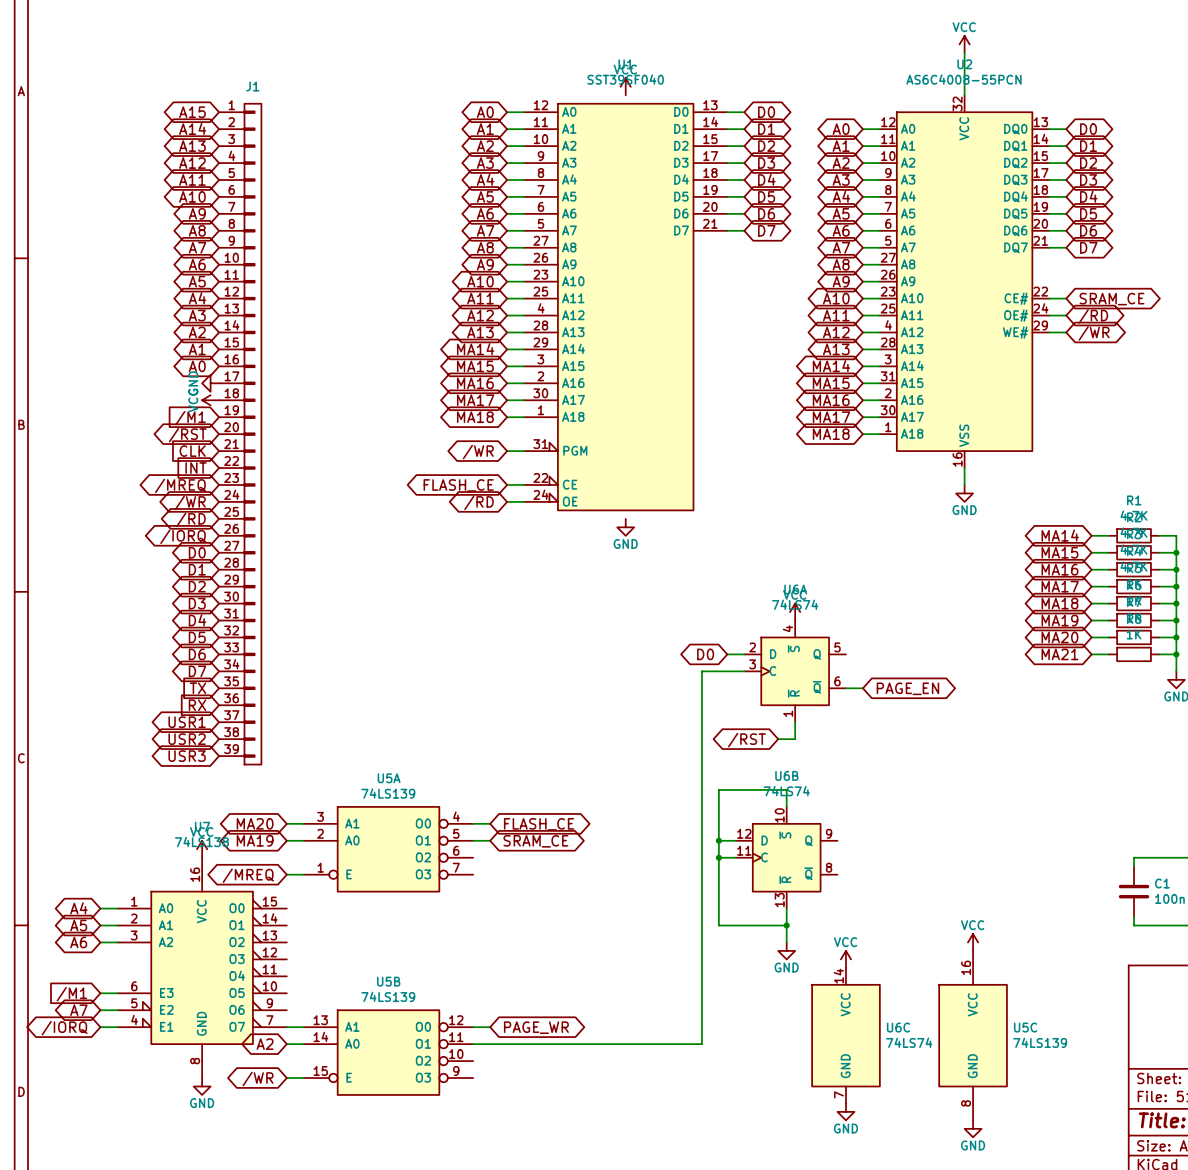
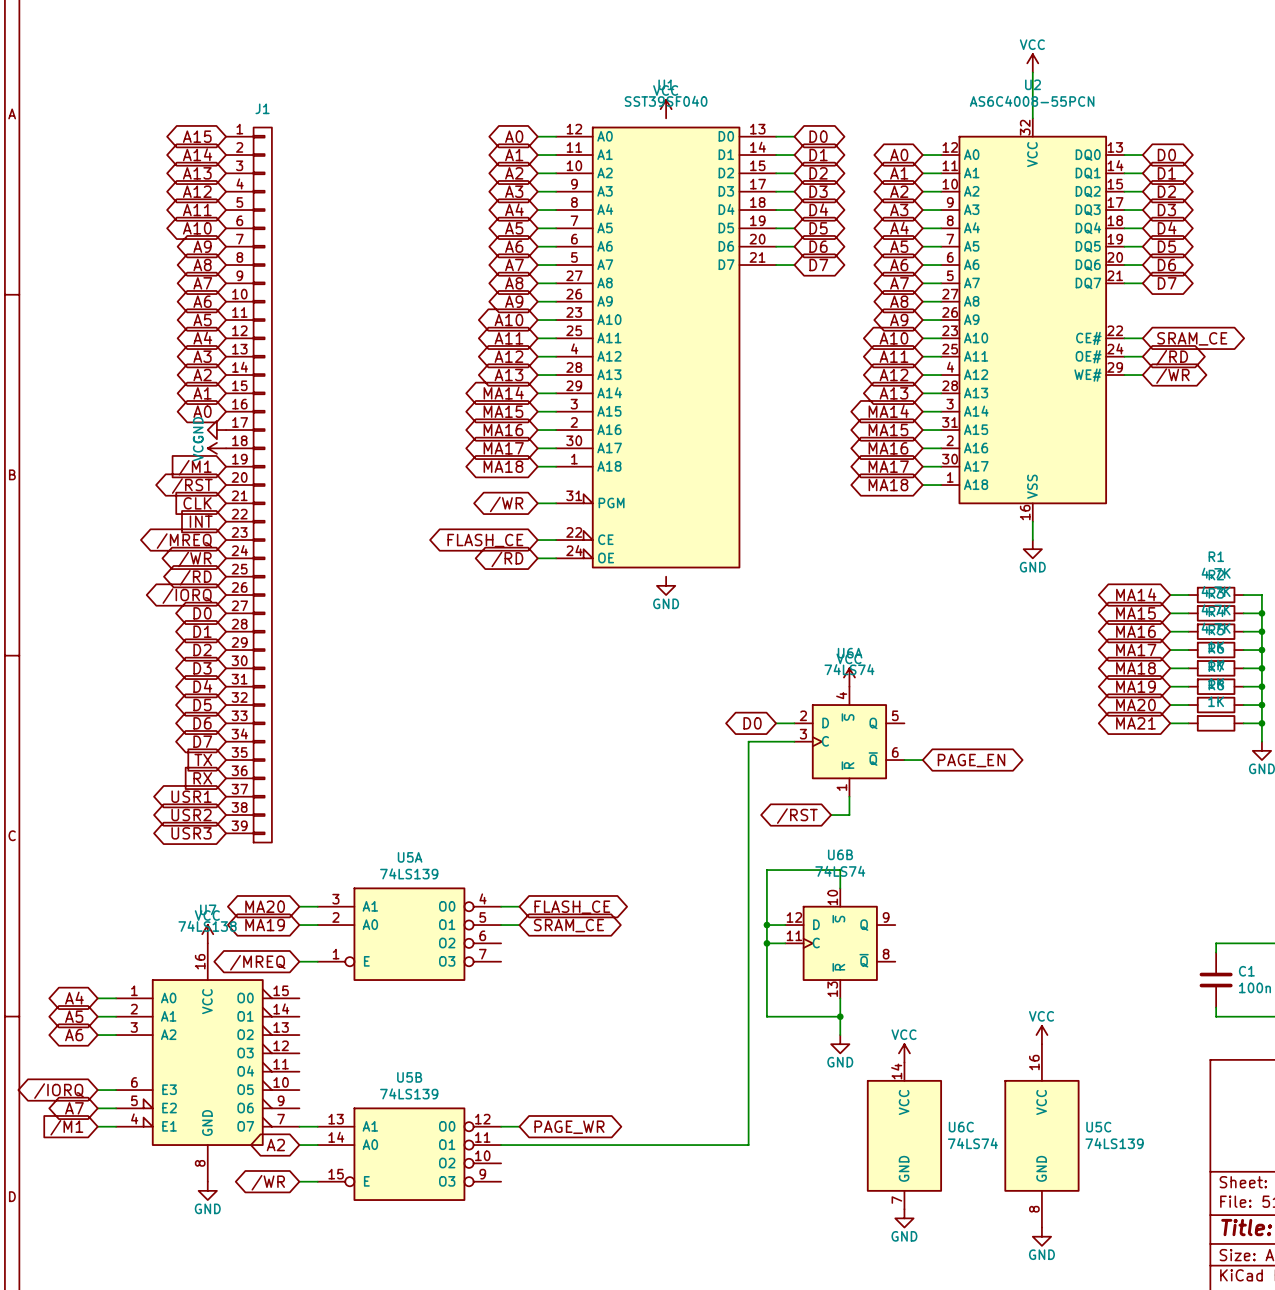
global label shape: input (71, 994) -> bidirectional (58, 1091)
global label: /M1 (71, 994) -> /IORQ (58, 1091)
global label shape: bidirectional (64, 1028) -> input (66, 1127)
global label: /IORQ (64, 1028) -> /M1 (66, 1127)

